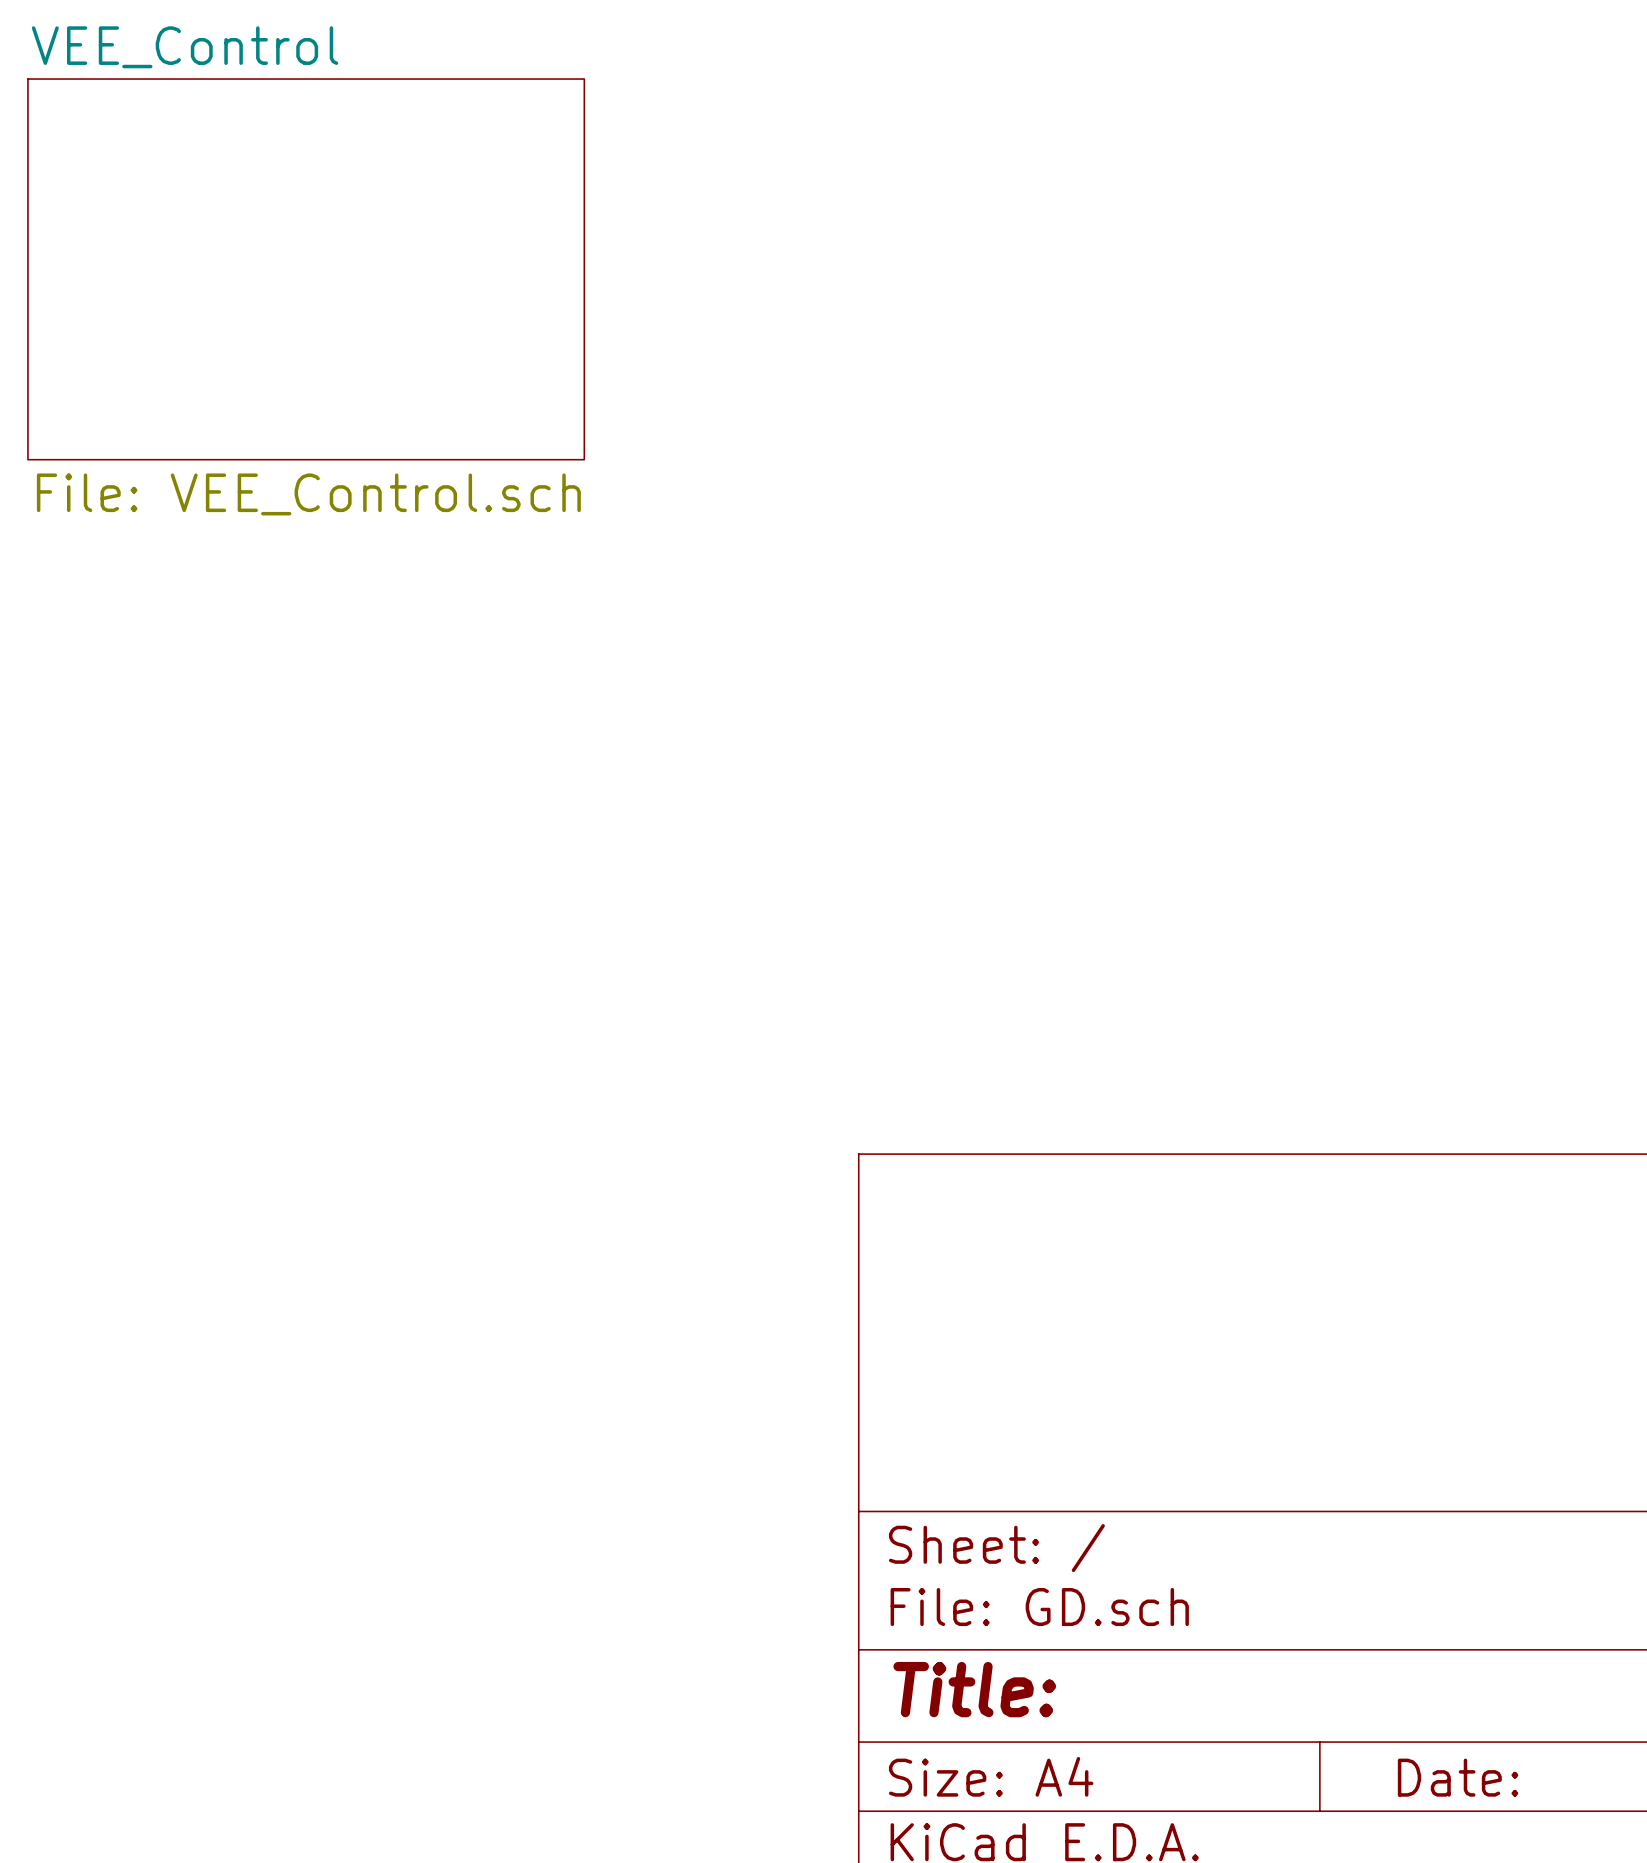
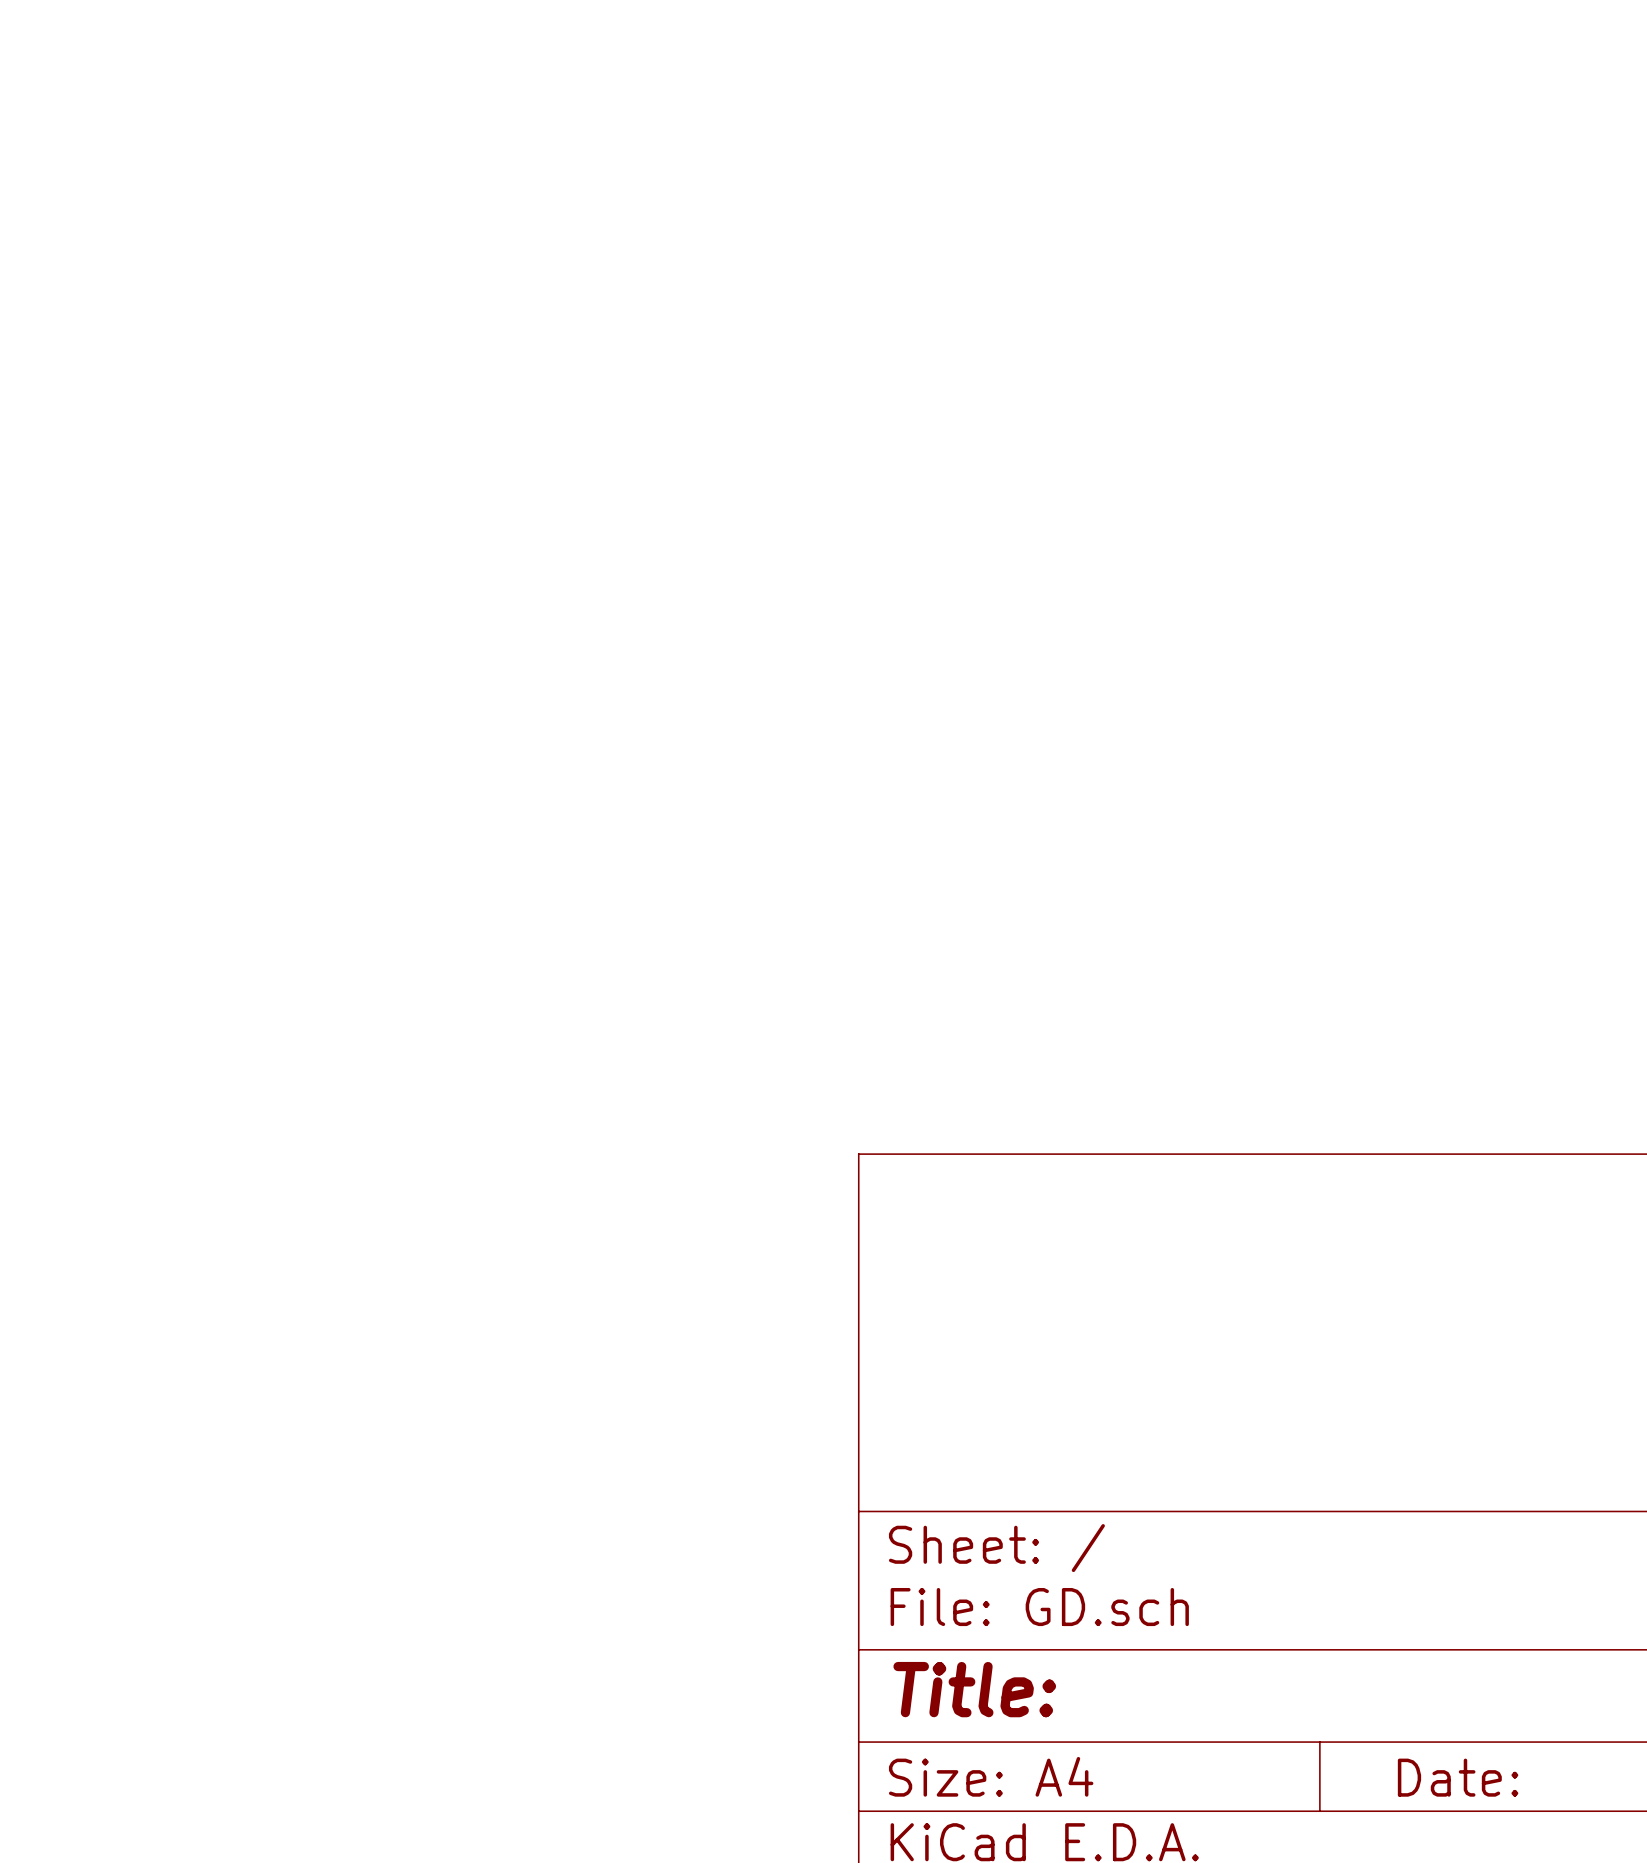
sheet VEE_Control: File: VEE_Control.sch (306, 269) -> none

